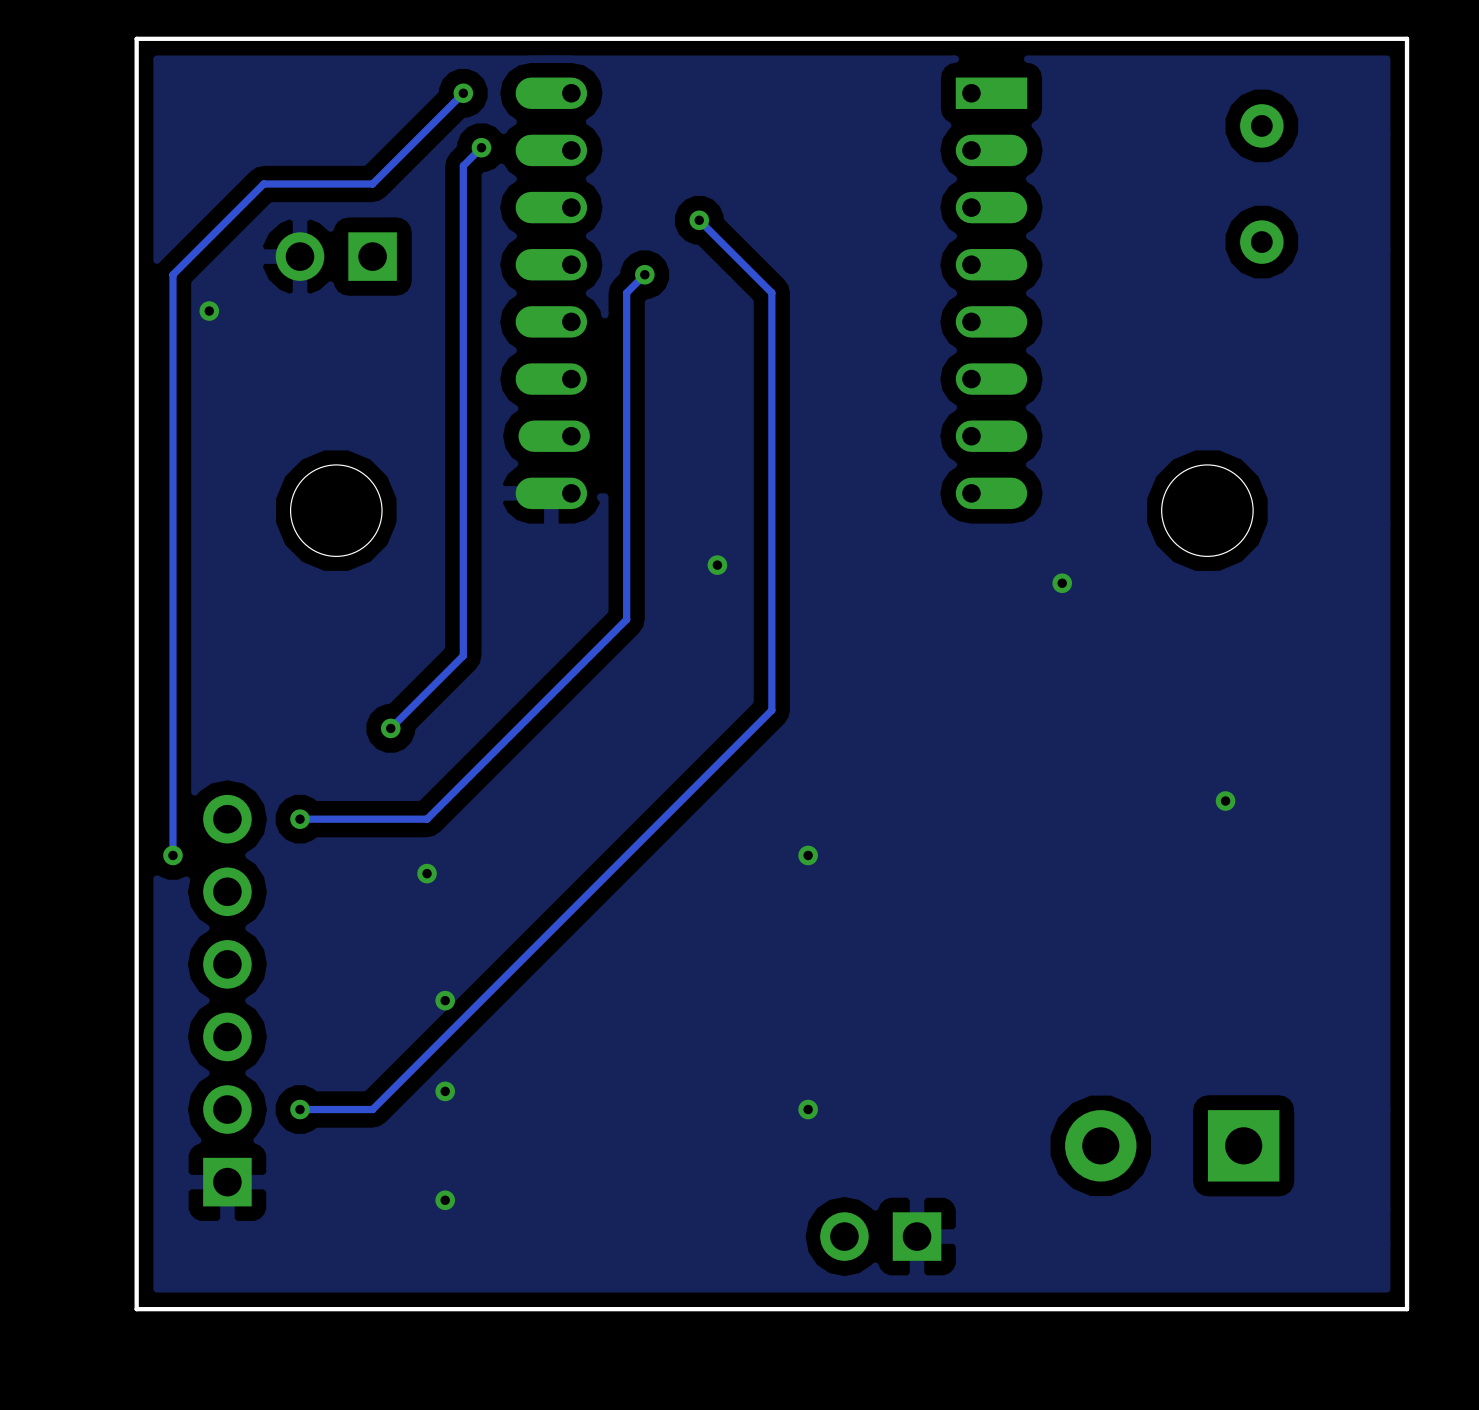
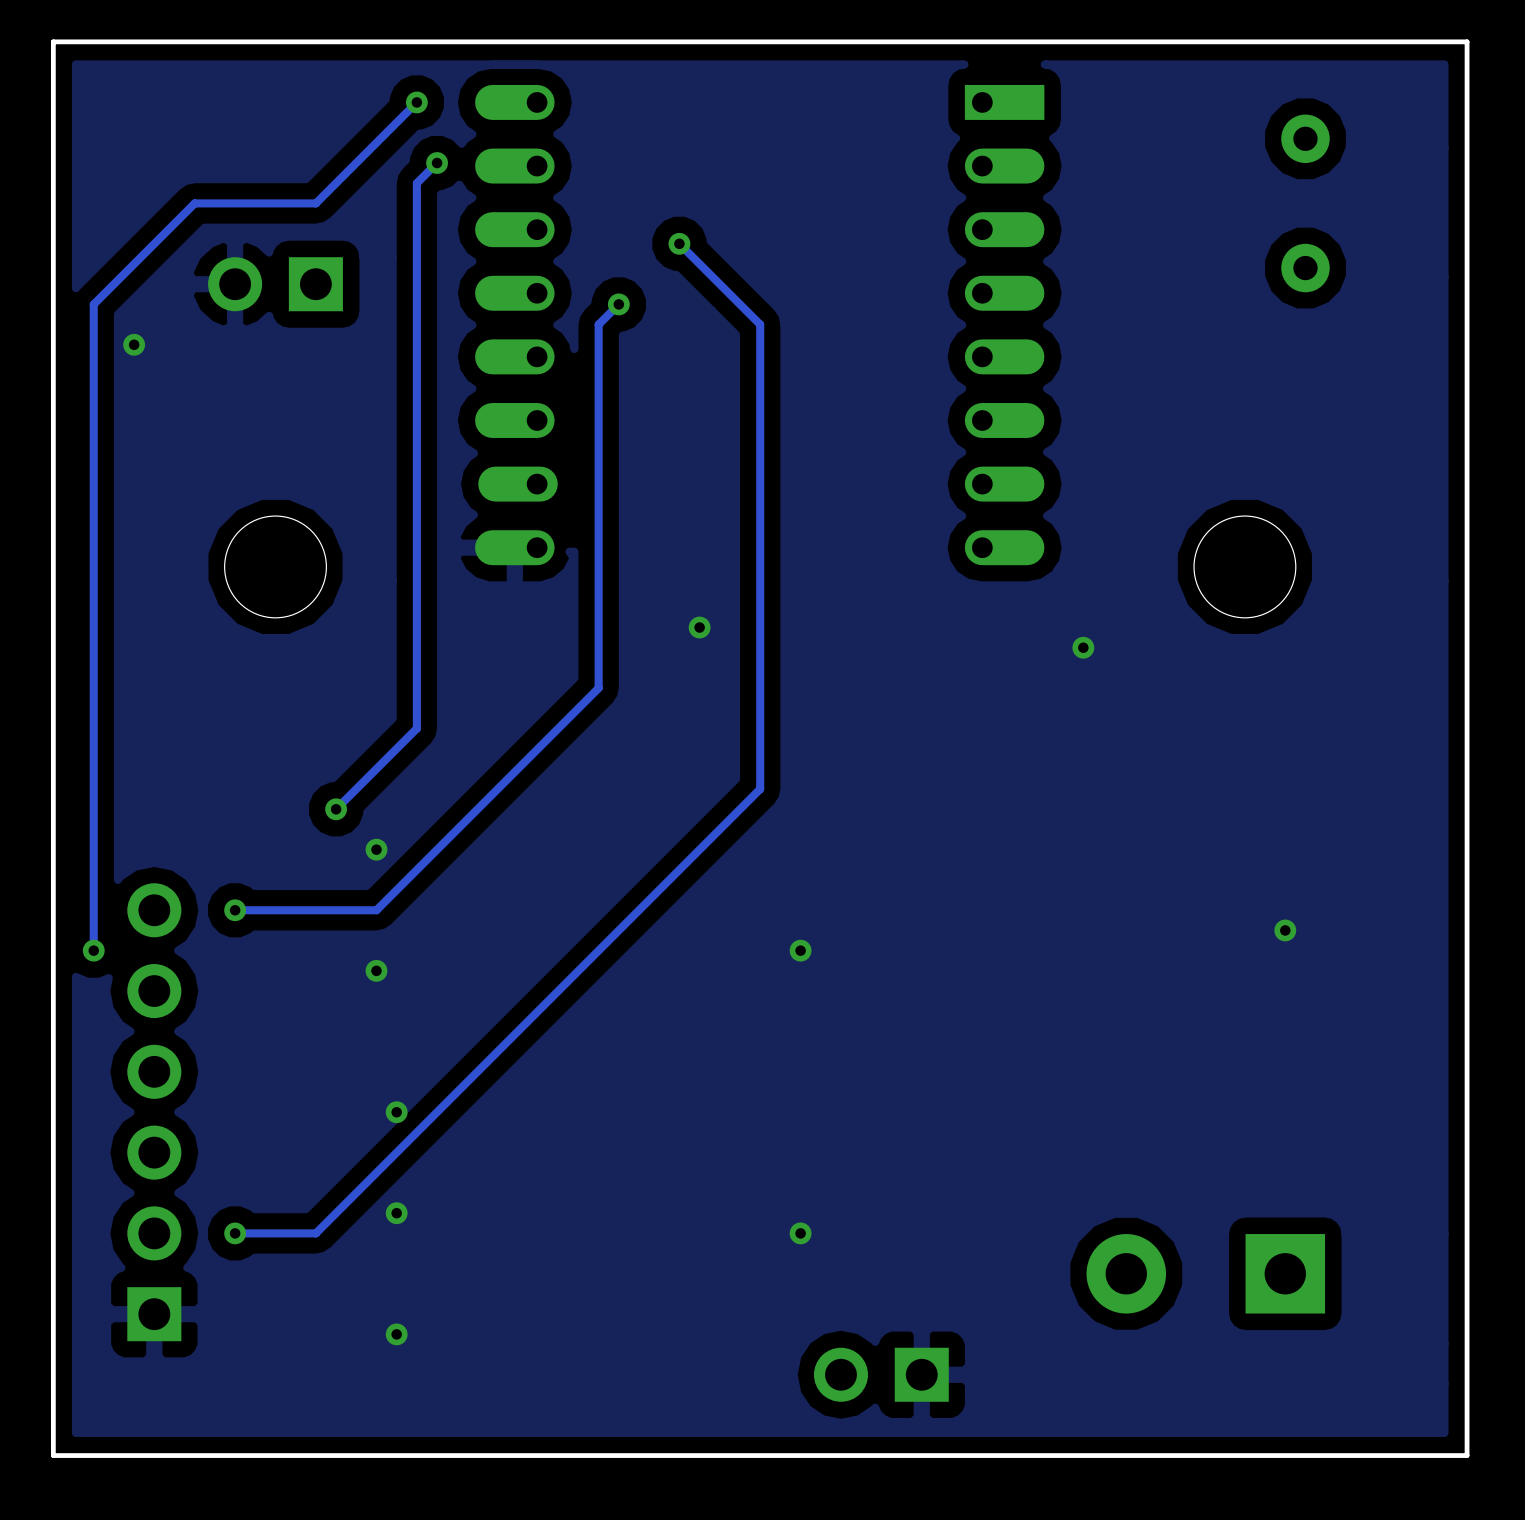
via: none -> (376, 849)
via position: (1225, 801) -> (1285, 930)

